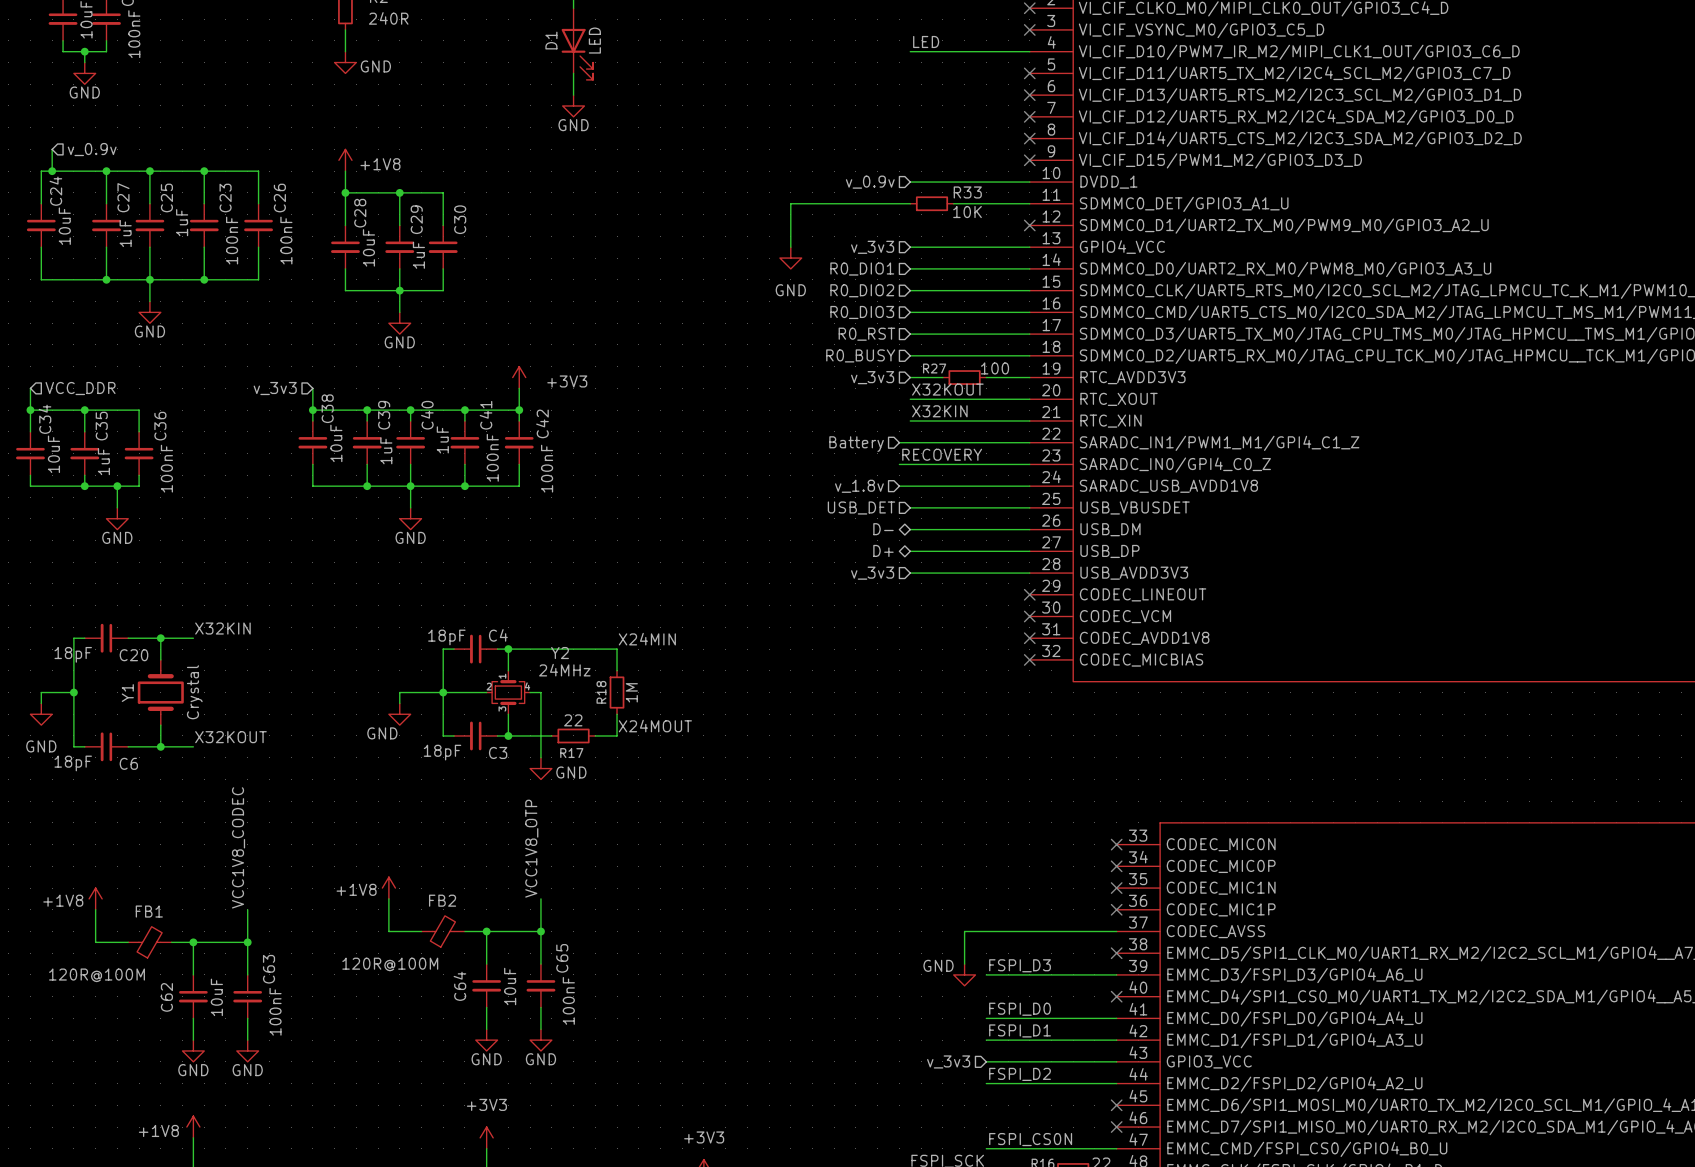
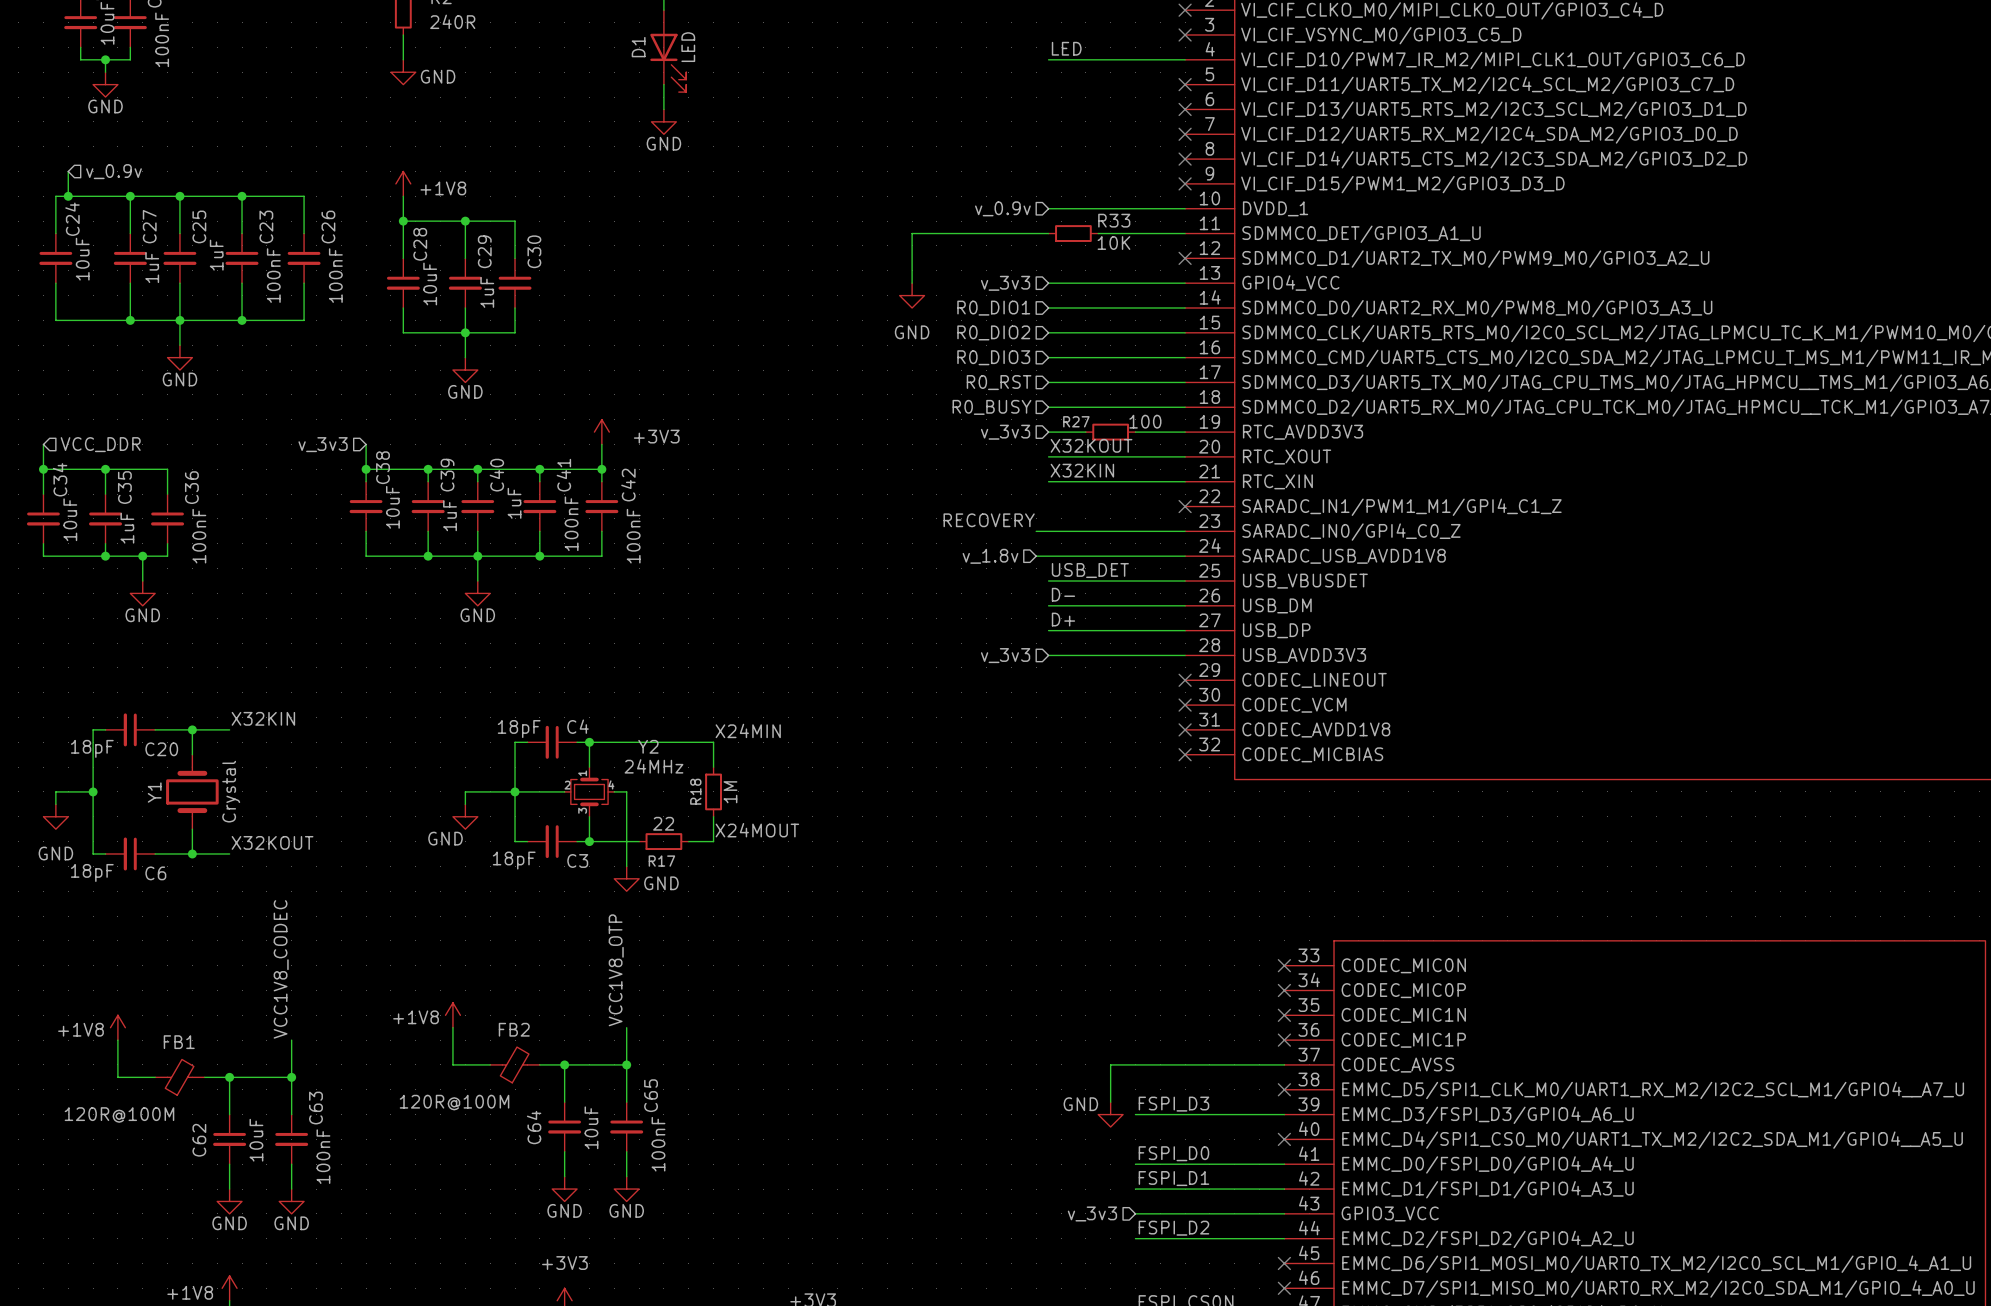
wire: (899, 442) (1029, 442) -> none
no-connect mark: none -> (1185, 506)
hierarchical label: Battery (856, 444) -> none
label position: RECOVERY (942, 454) -> RECOVERY (989, 520)
label: none -> USB_DET (1090, 570)
hierarchical label: USB_DET (861, 507) -> none
label: none -> D- (1063, 594)
hierarchical label: D- (883, 529) -> none
label: none -> D+ (1063, 619)
hierarchical label: D+ (883, 550) -> none

